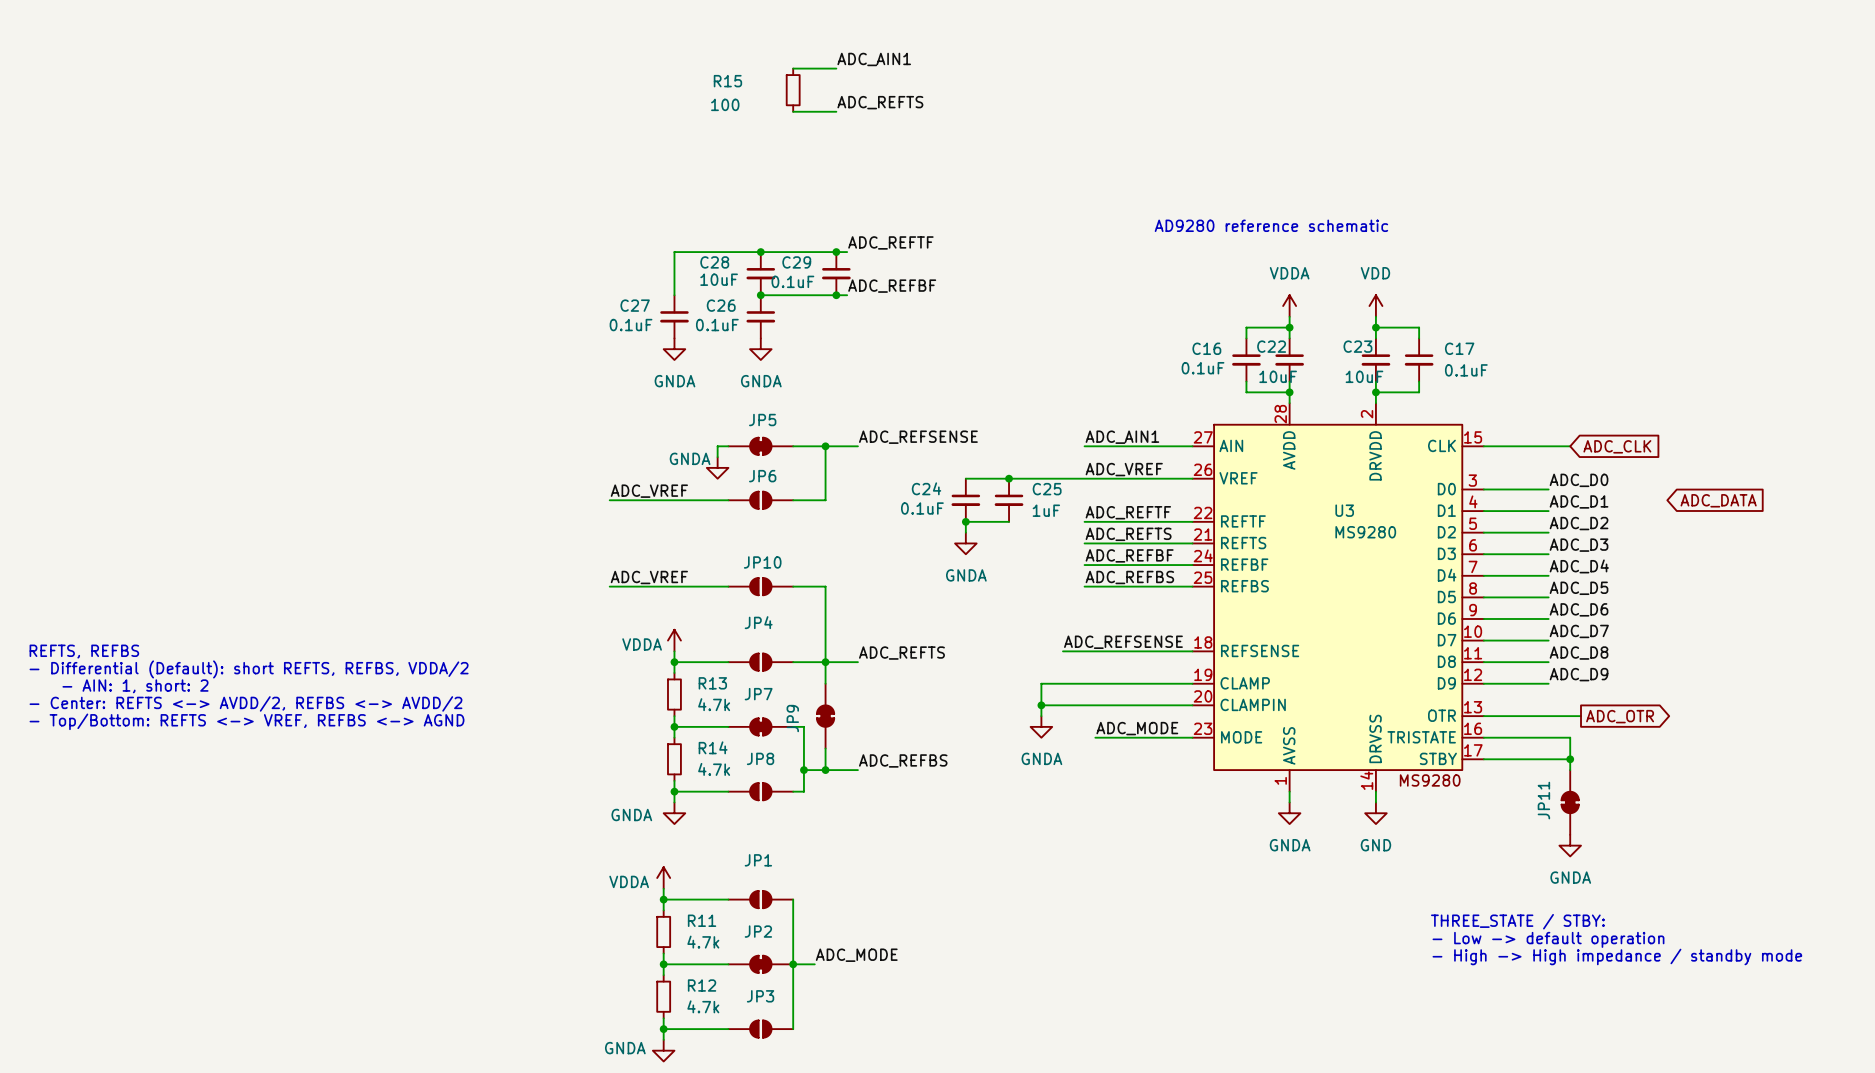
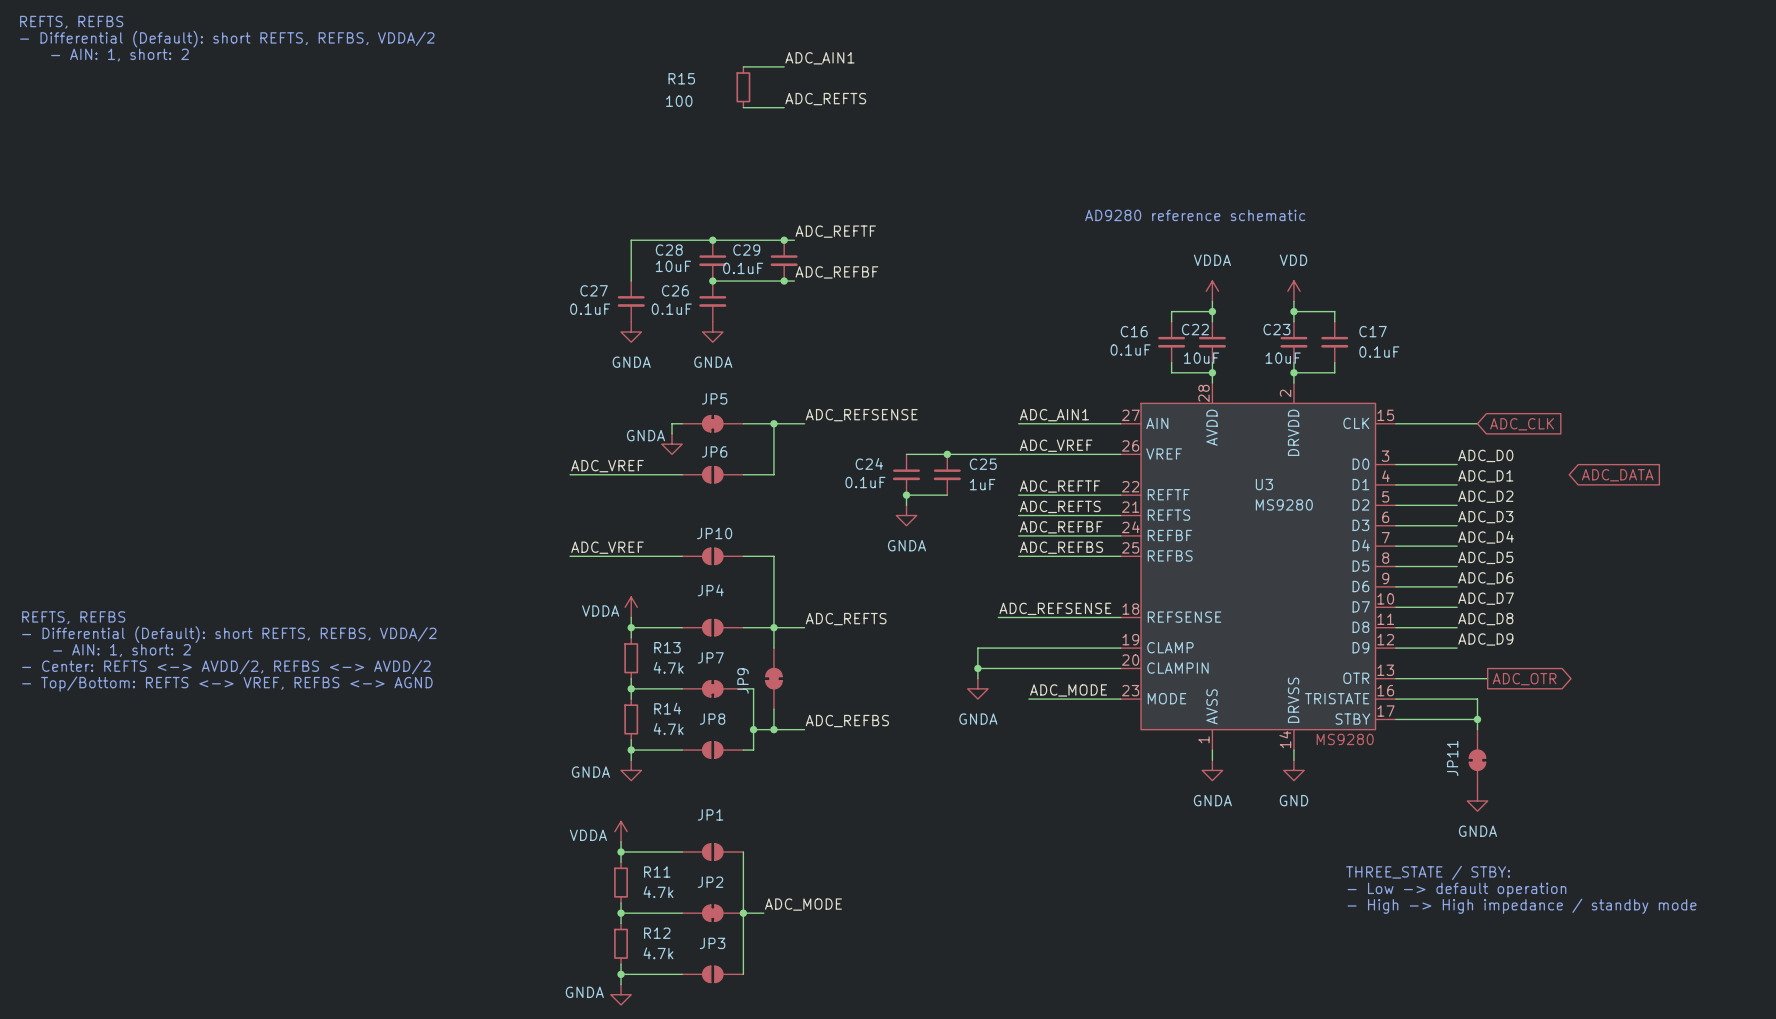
text: none -> REFTS, REFBS (71, 22)
text: none -> - Differential (Default): short REFTS, REFBS, VDDA/2 (227, 39)
text: none -> - AIN: 1, short: 2 (119, 55)

